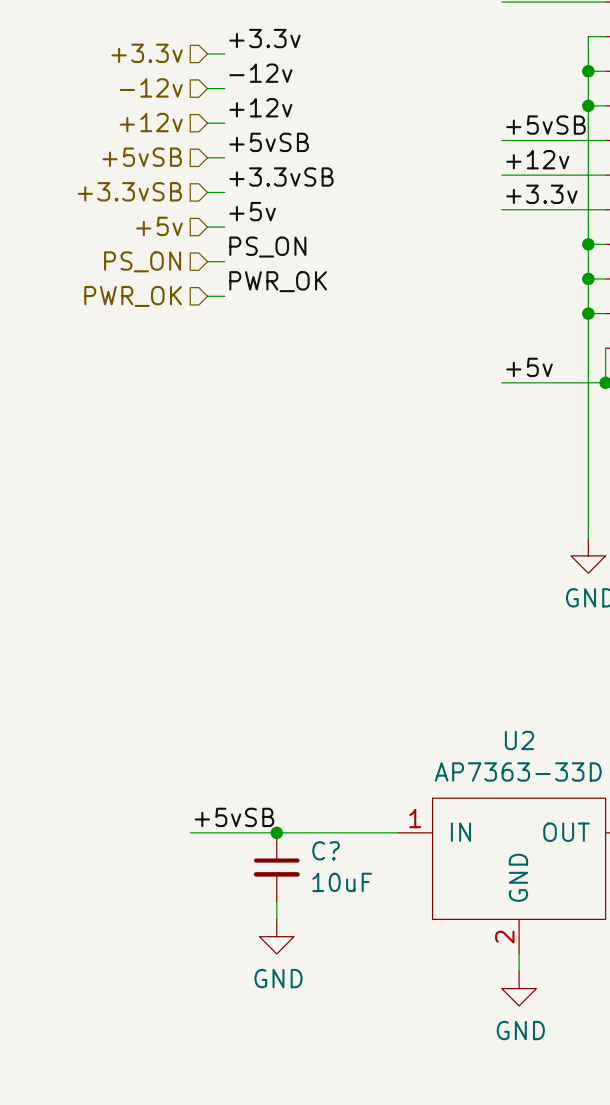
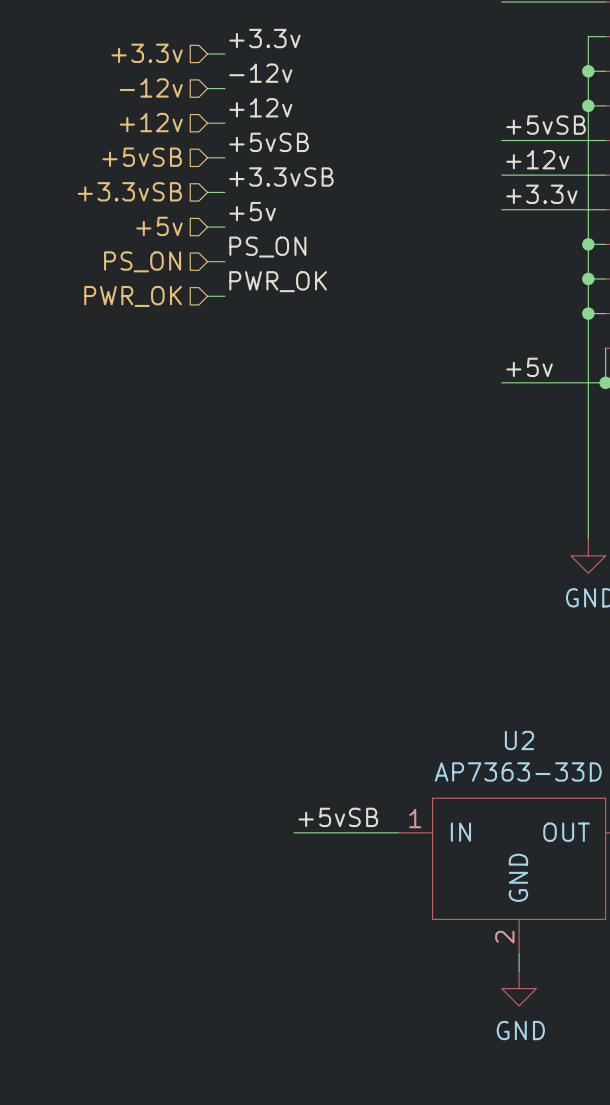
label position: +5vSB (234, 817) -> +5vSB (338, 817)
wire: (190, 832) (294, 832) -> none
junction: (276, 832) -> none
C?: 10uF (276, 867) -> none
wire: (276, 902) (276, 919) -> none
power symbol: GND (276, 936) -> none

